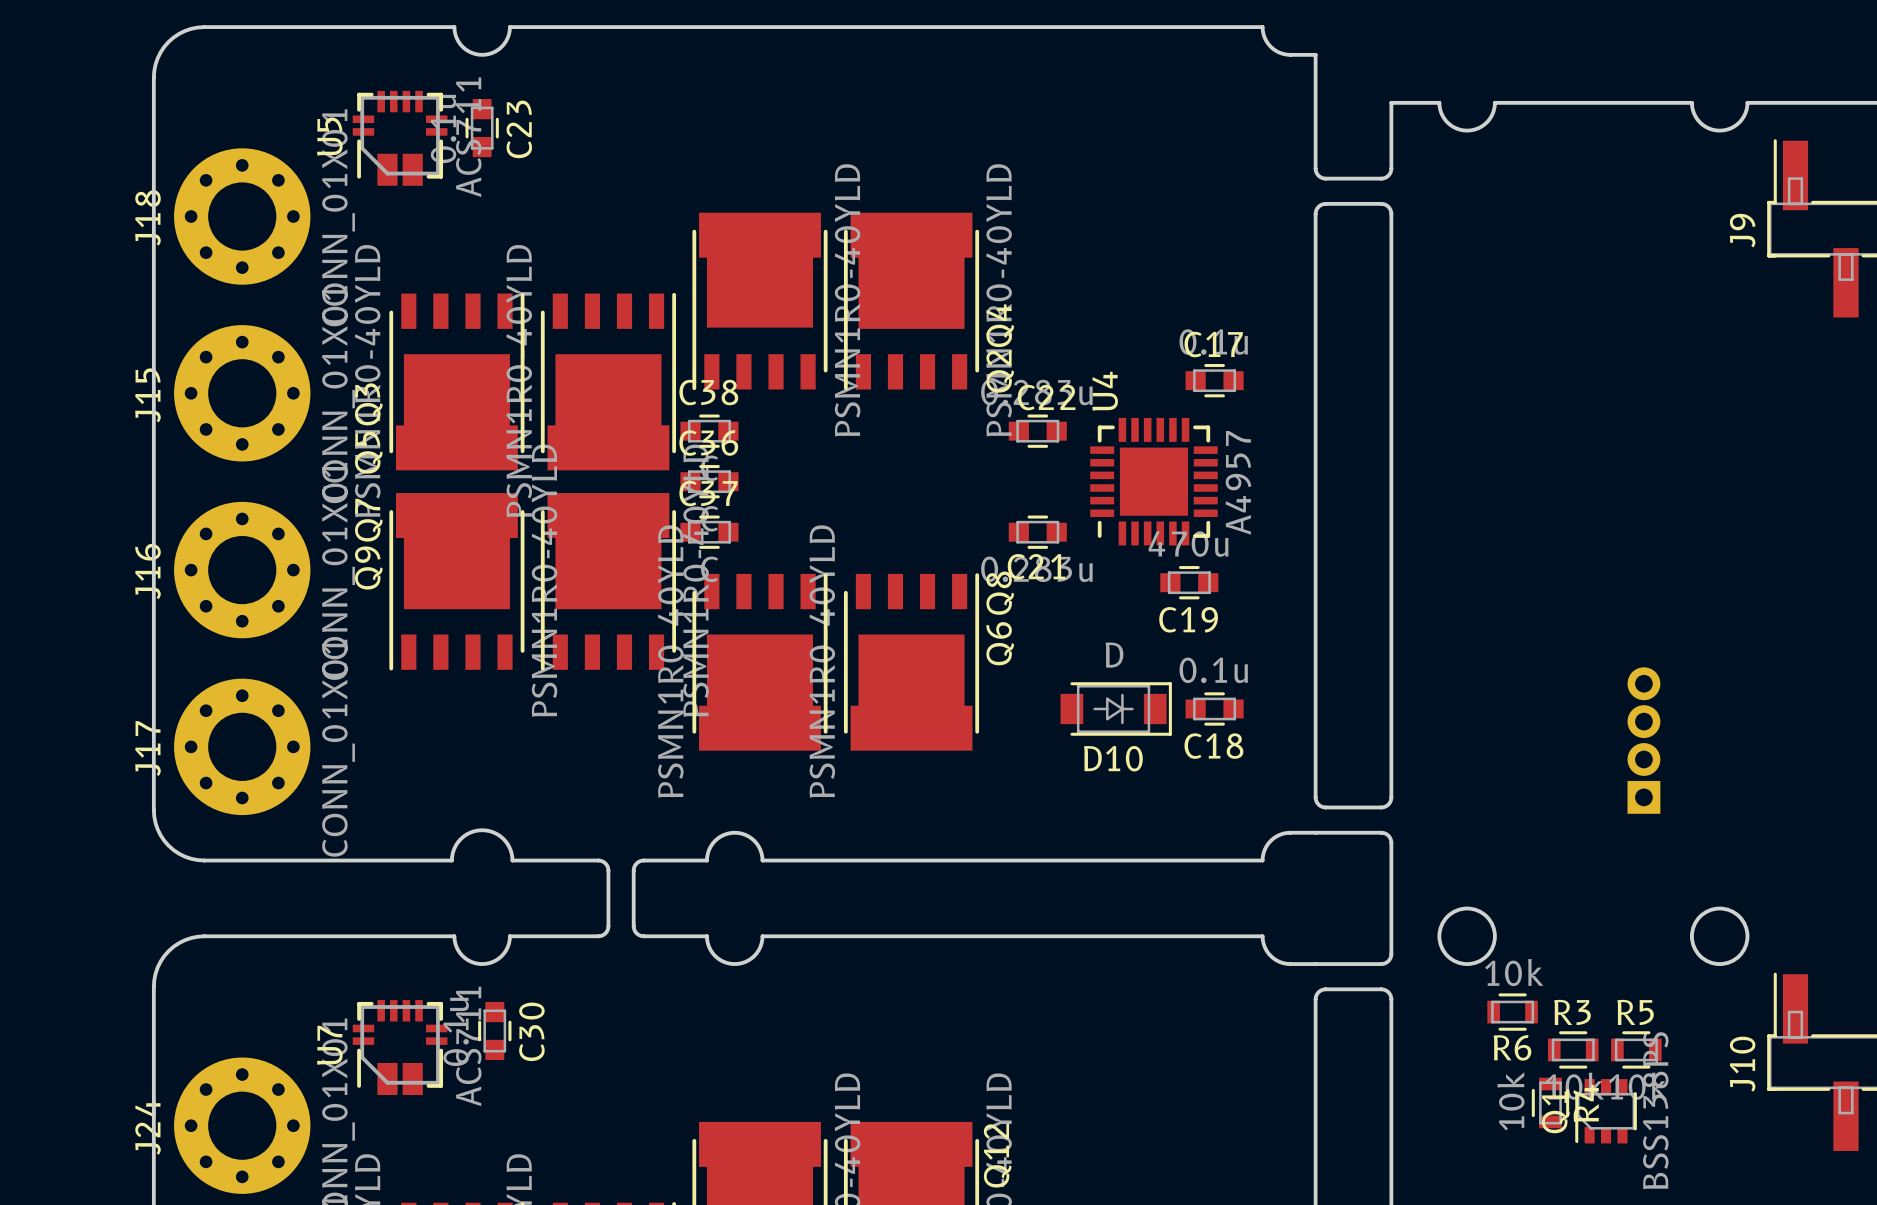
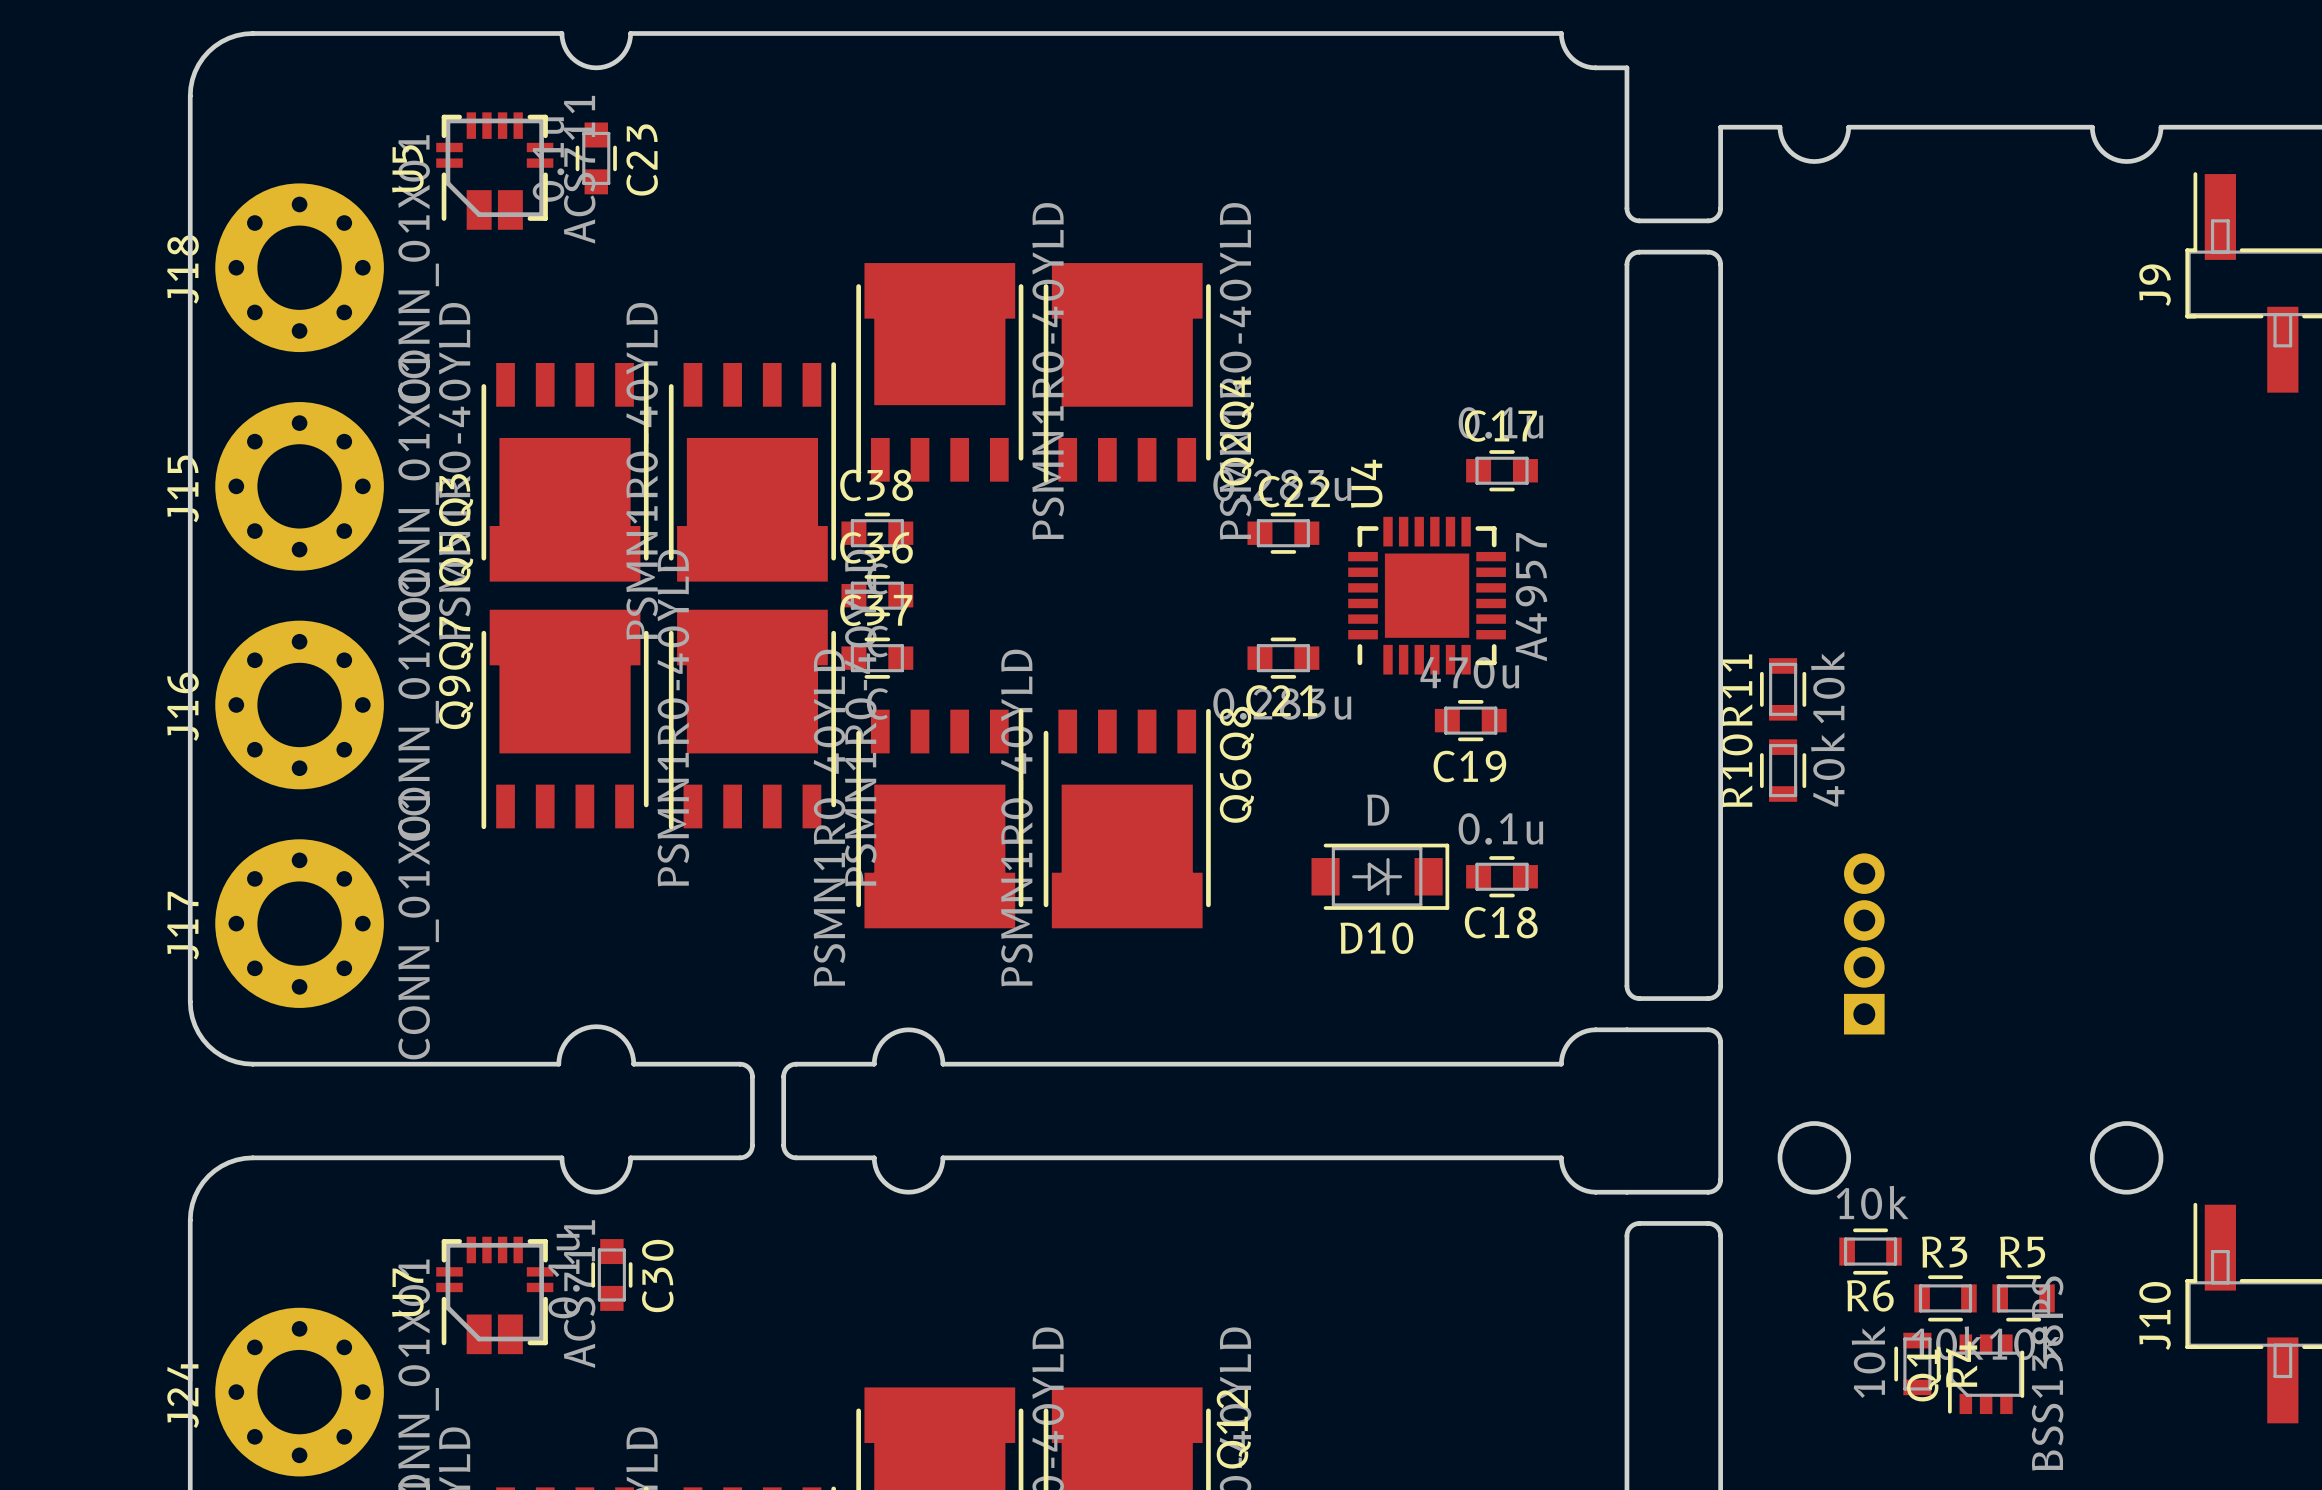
R11: none -> 10k (1783, 689)
R10: none -> 40k (1783, 770)
part position: (1643, 740) -> (1864, 943)

